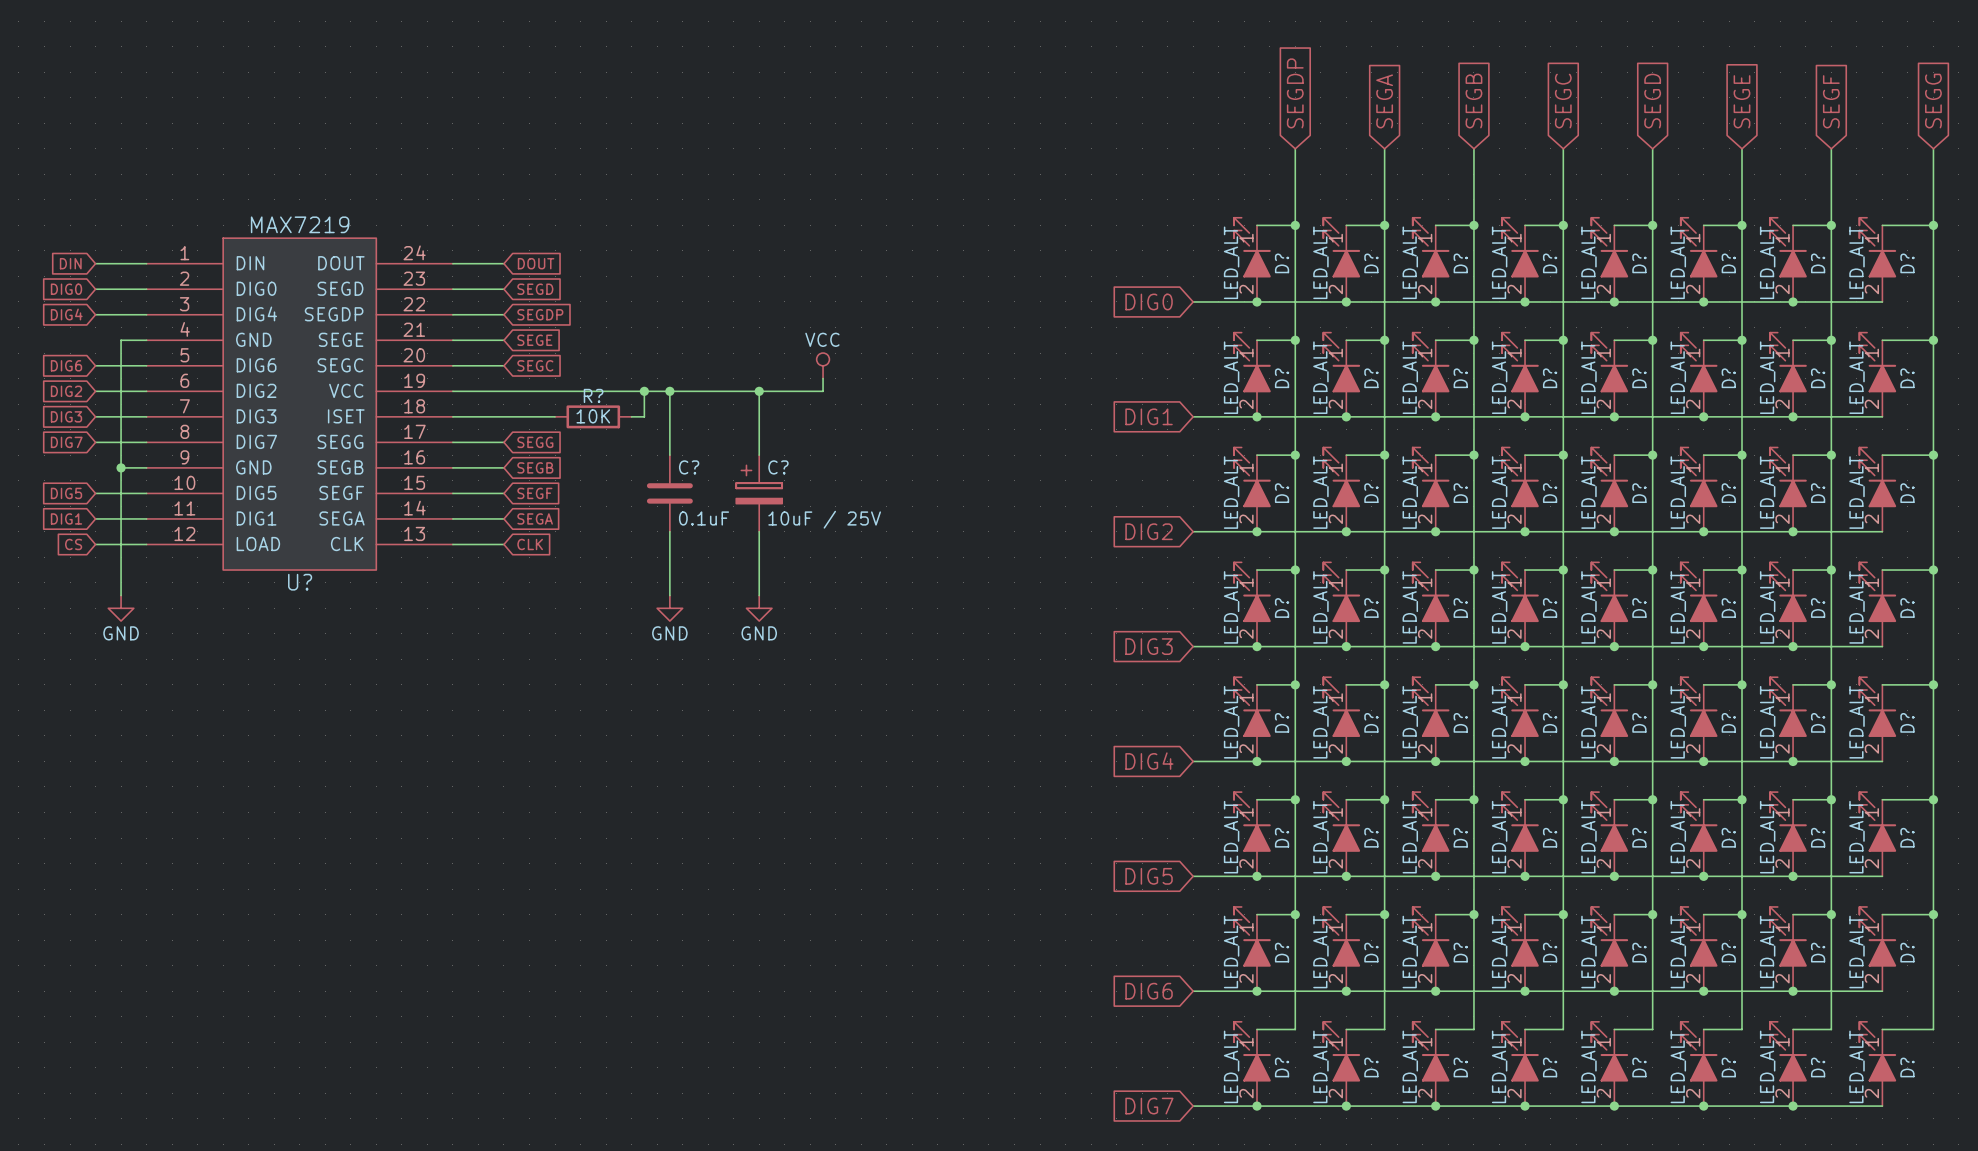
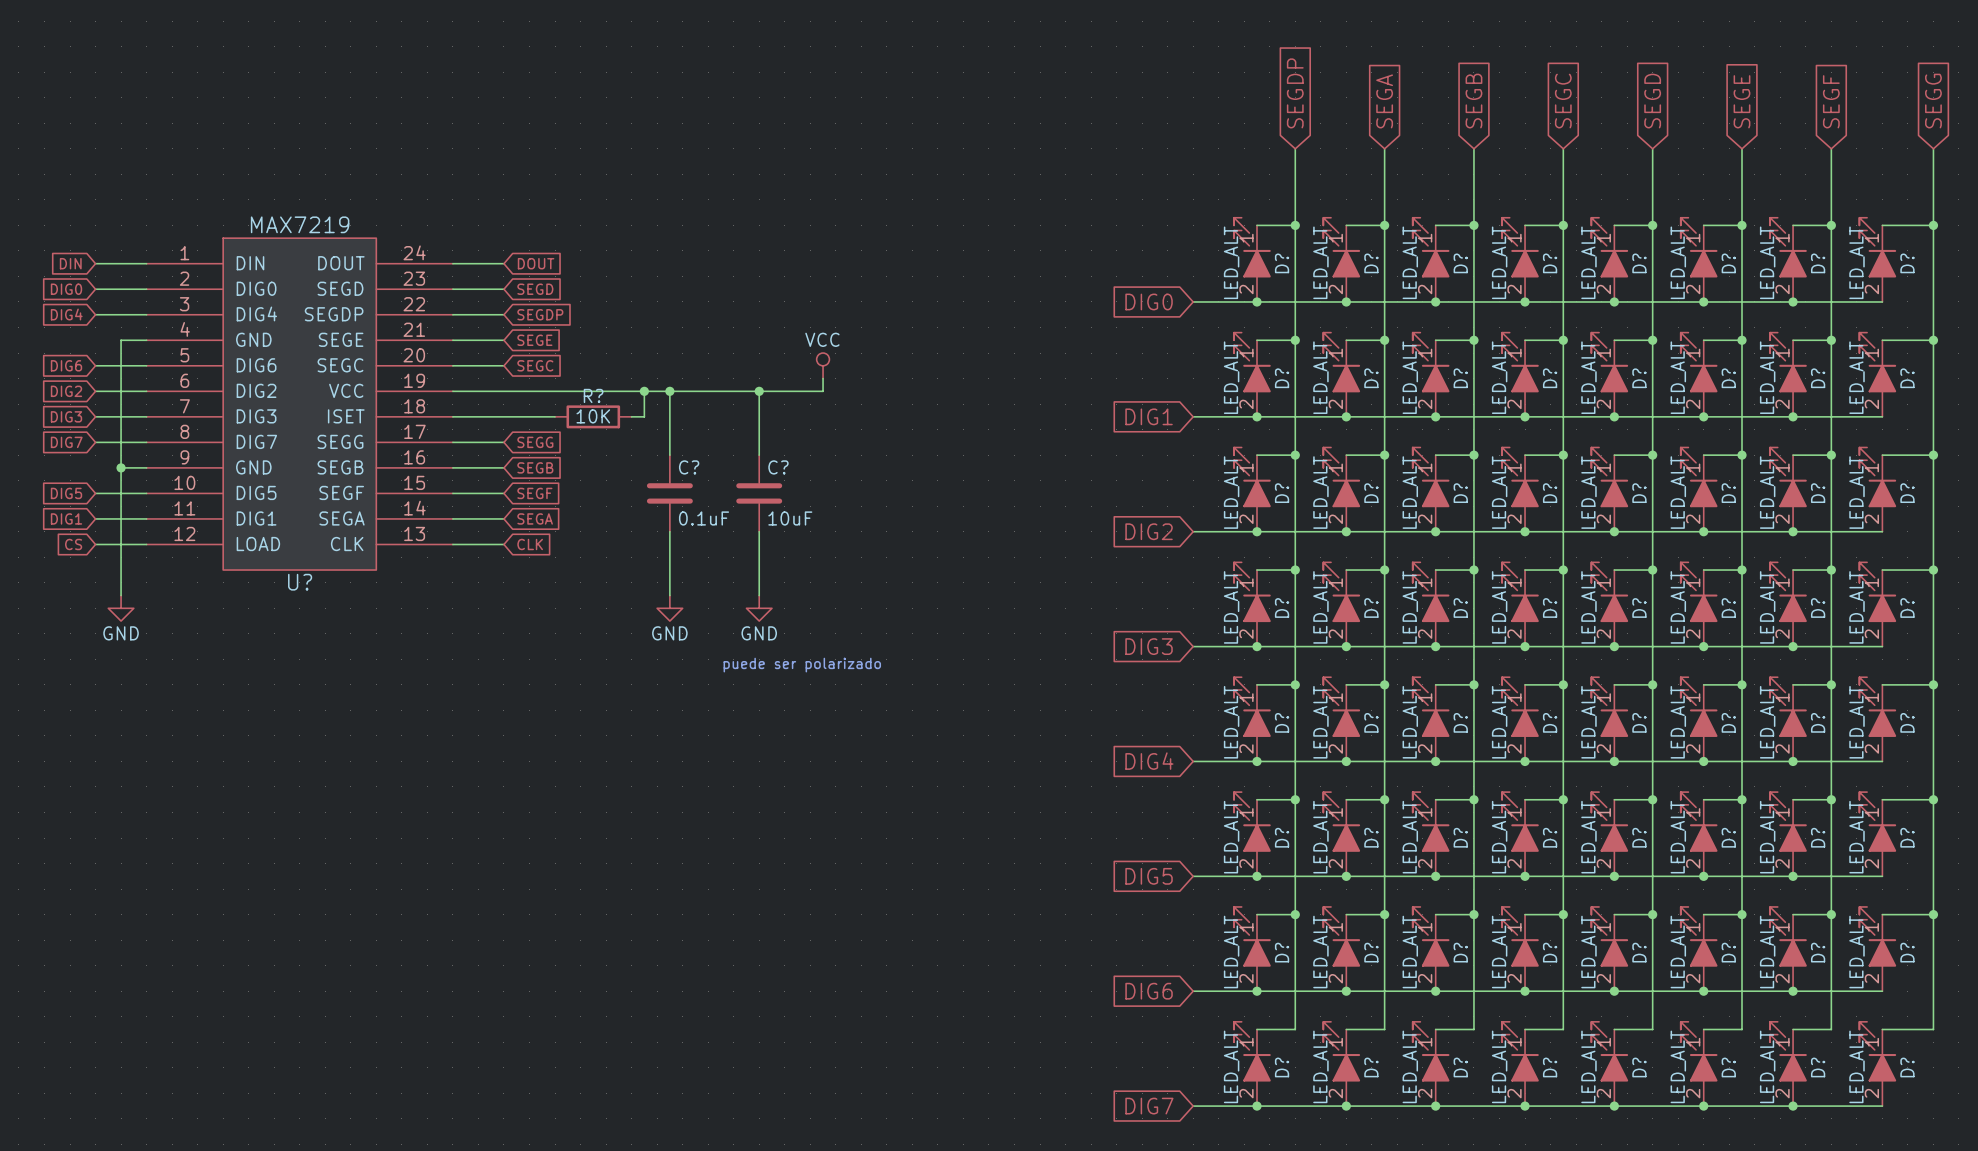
C? symbol: [736, 455, 783, 532] -> [736, 455, 783, 532]
C? value: 10uF / 25V (824, 519) -> 10uF (790, 518)
text: none -> puede ser polarizado (802, 665)

